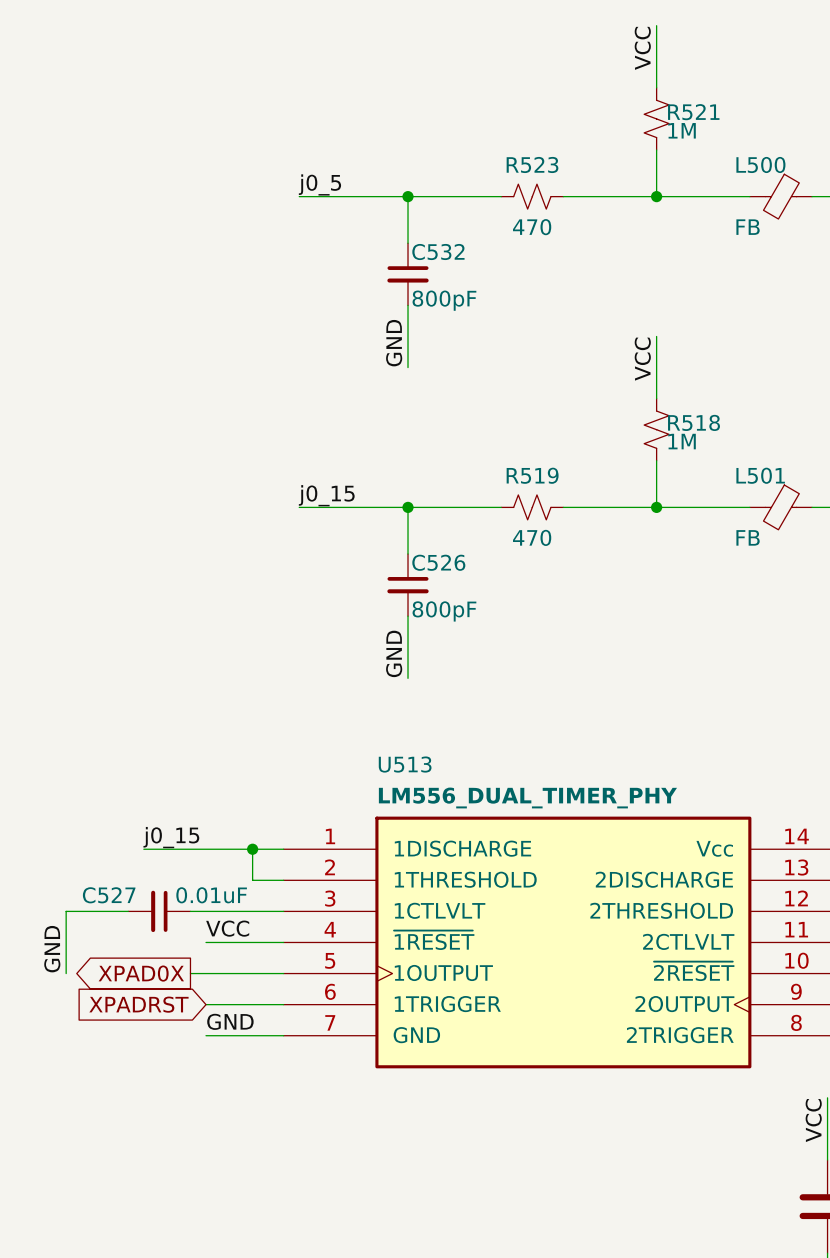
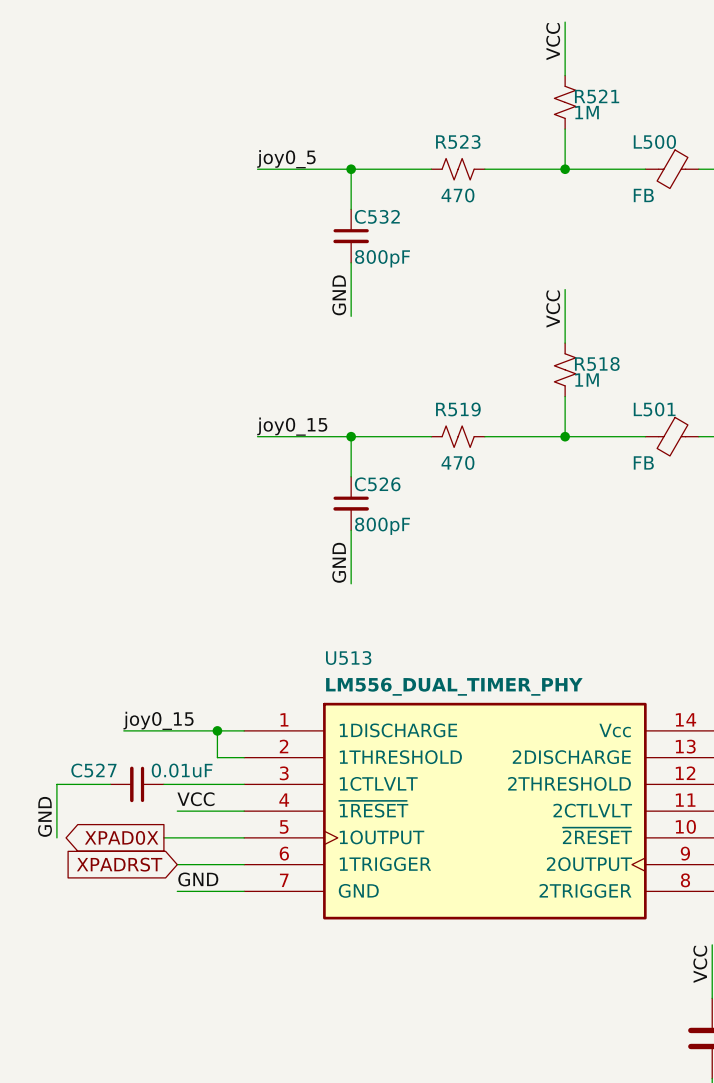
label: j0_5 (319, 184) -> joy0_5 (286, 159)
label: j0_15 (326, 495) -> joy0_15 (292, 426)
label: j0_15 (171, 837) -> joy0_15 (158, 720)

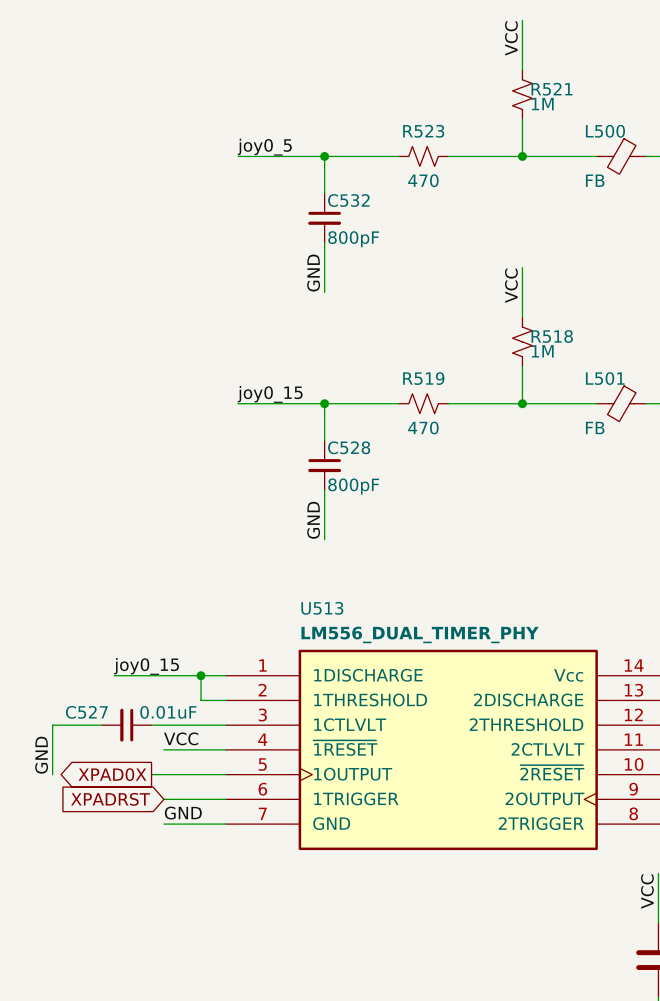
C526 name: C526 (377, 484) -> C528 (349, 447)

